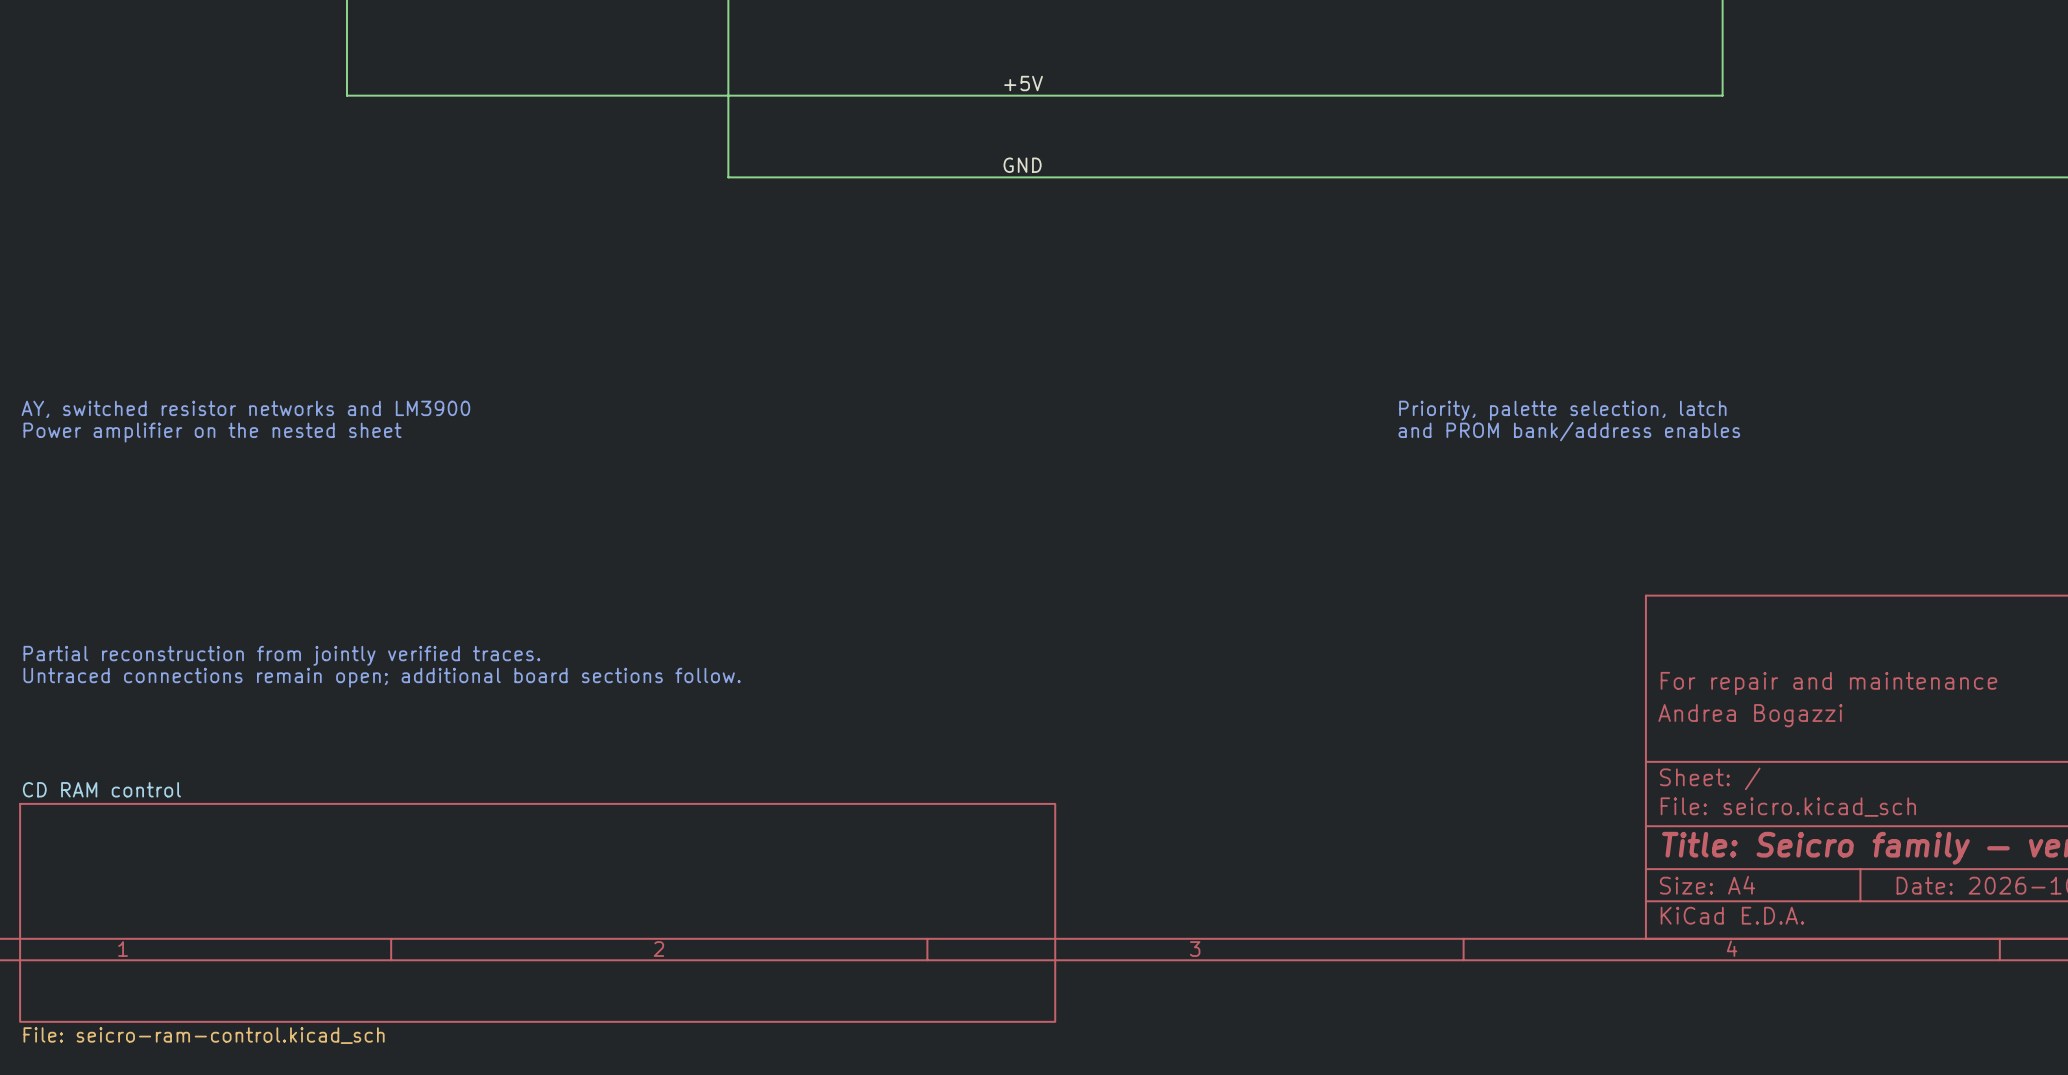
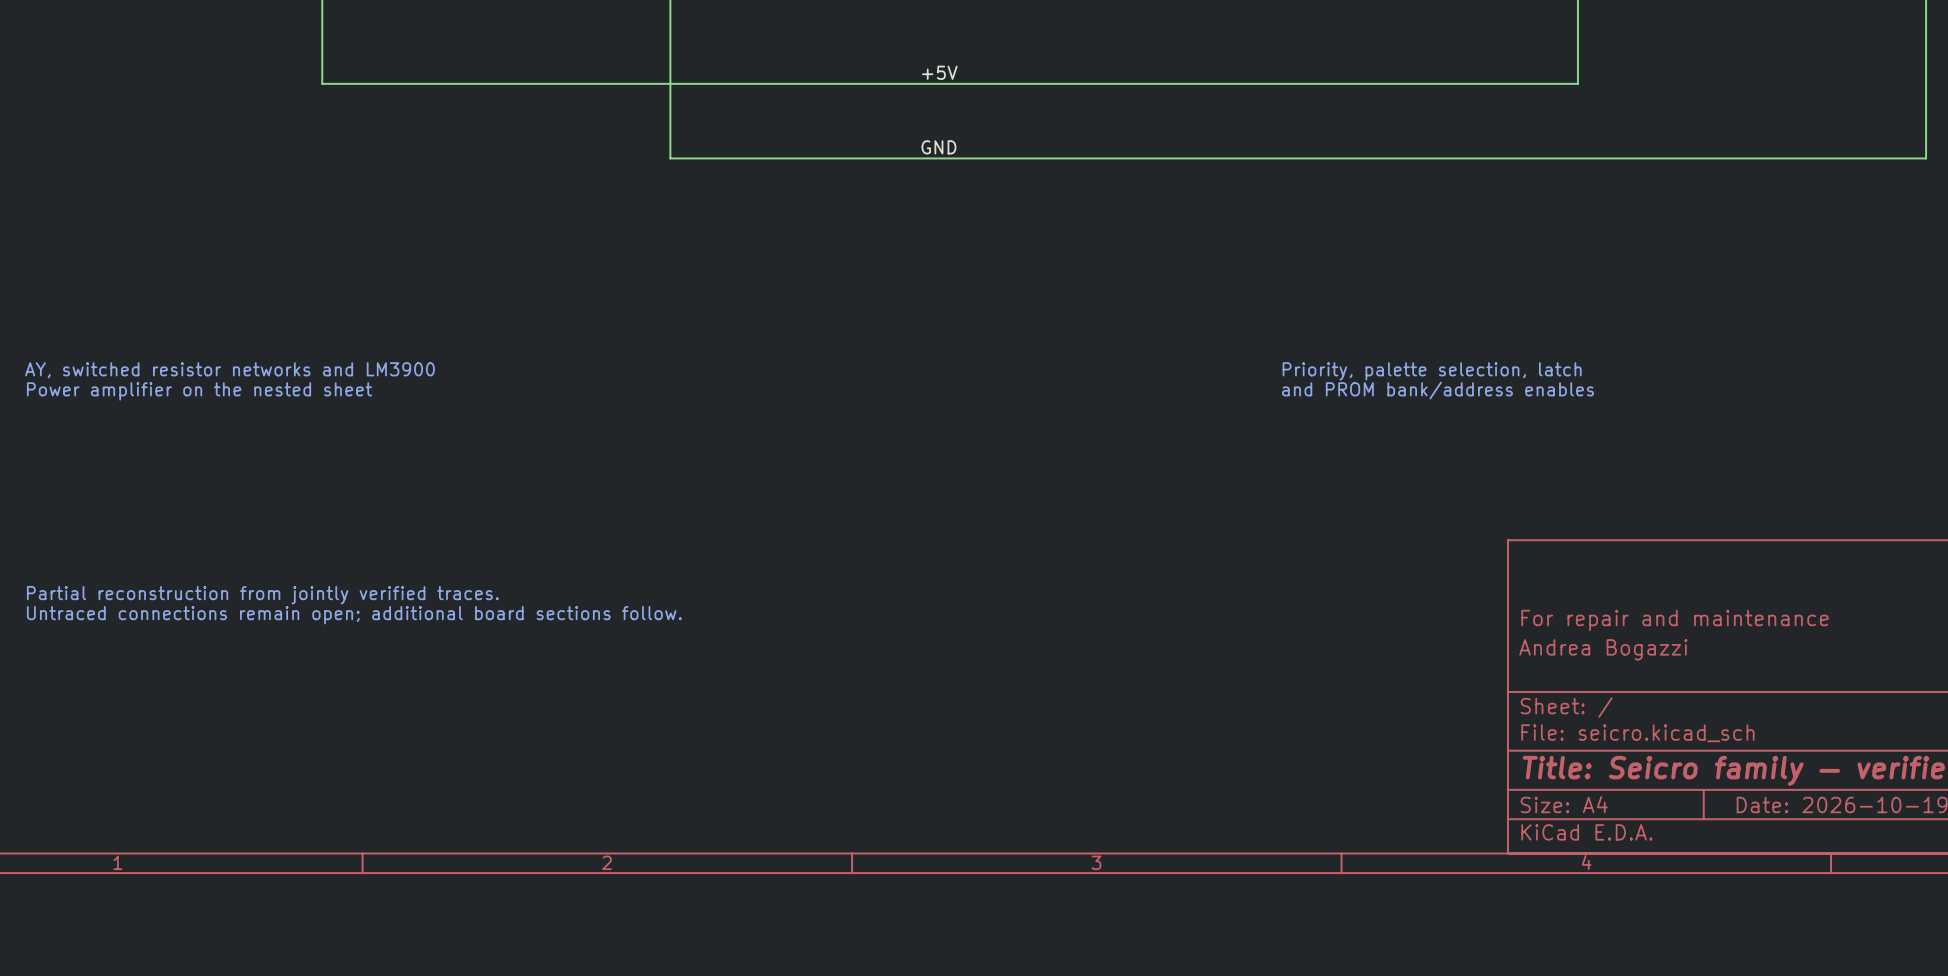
sheet CD RAM control: File: seicro-ram-control.kicad_sch (537, 912) -> none

